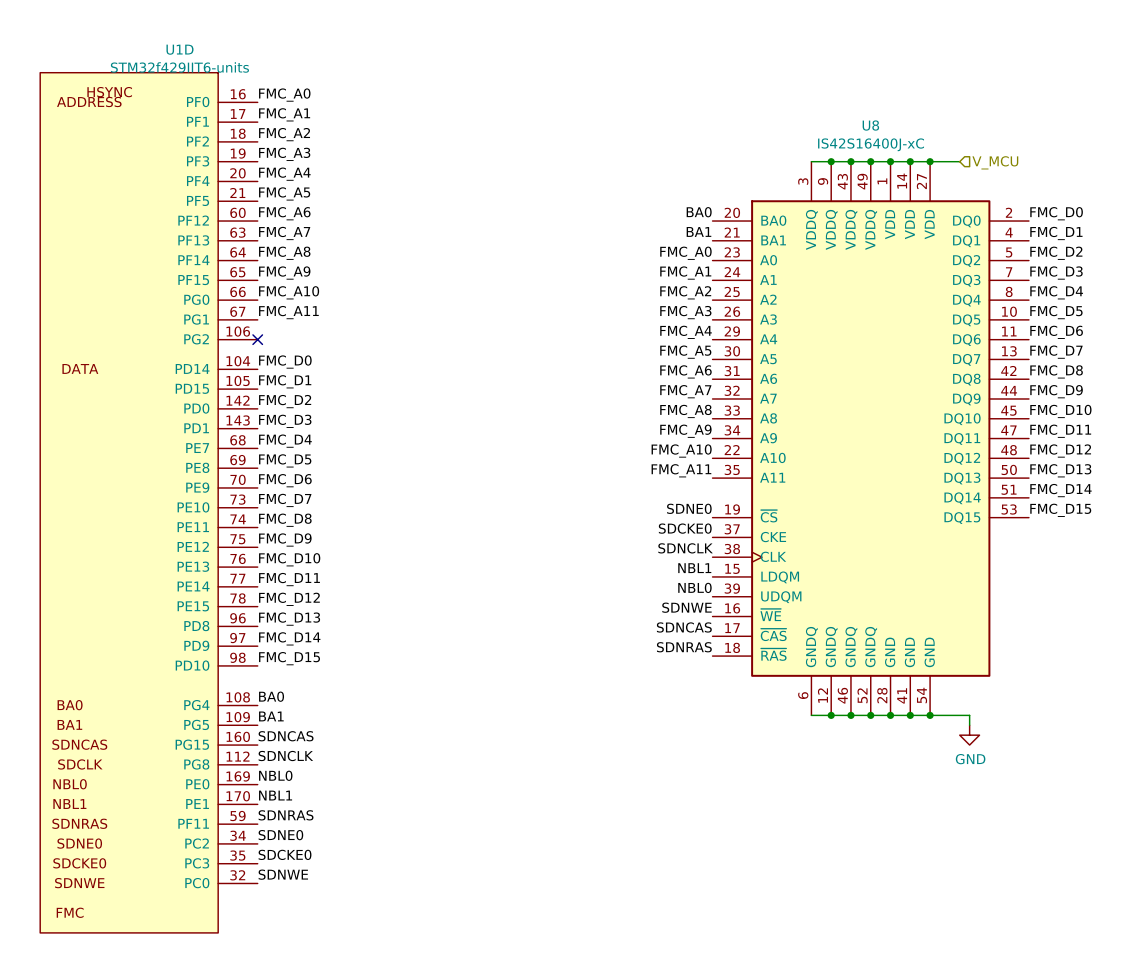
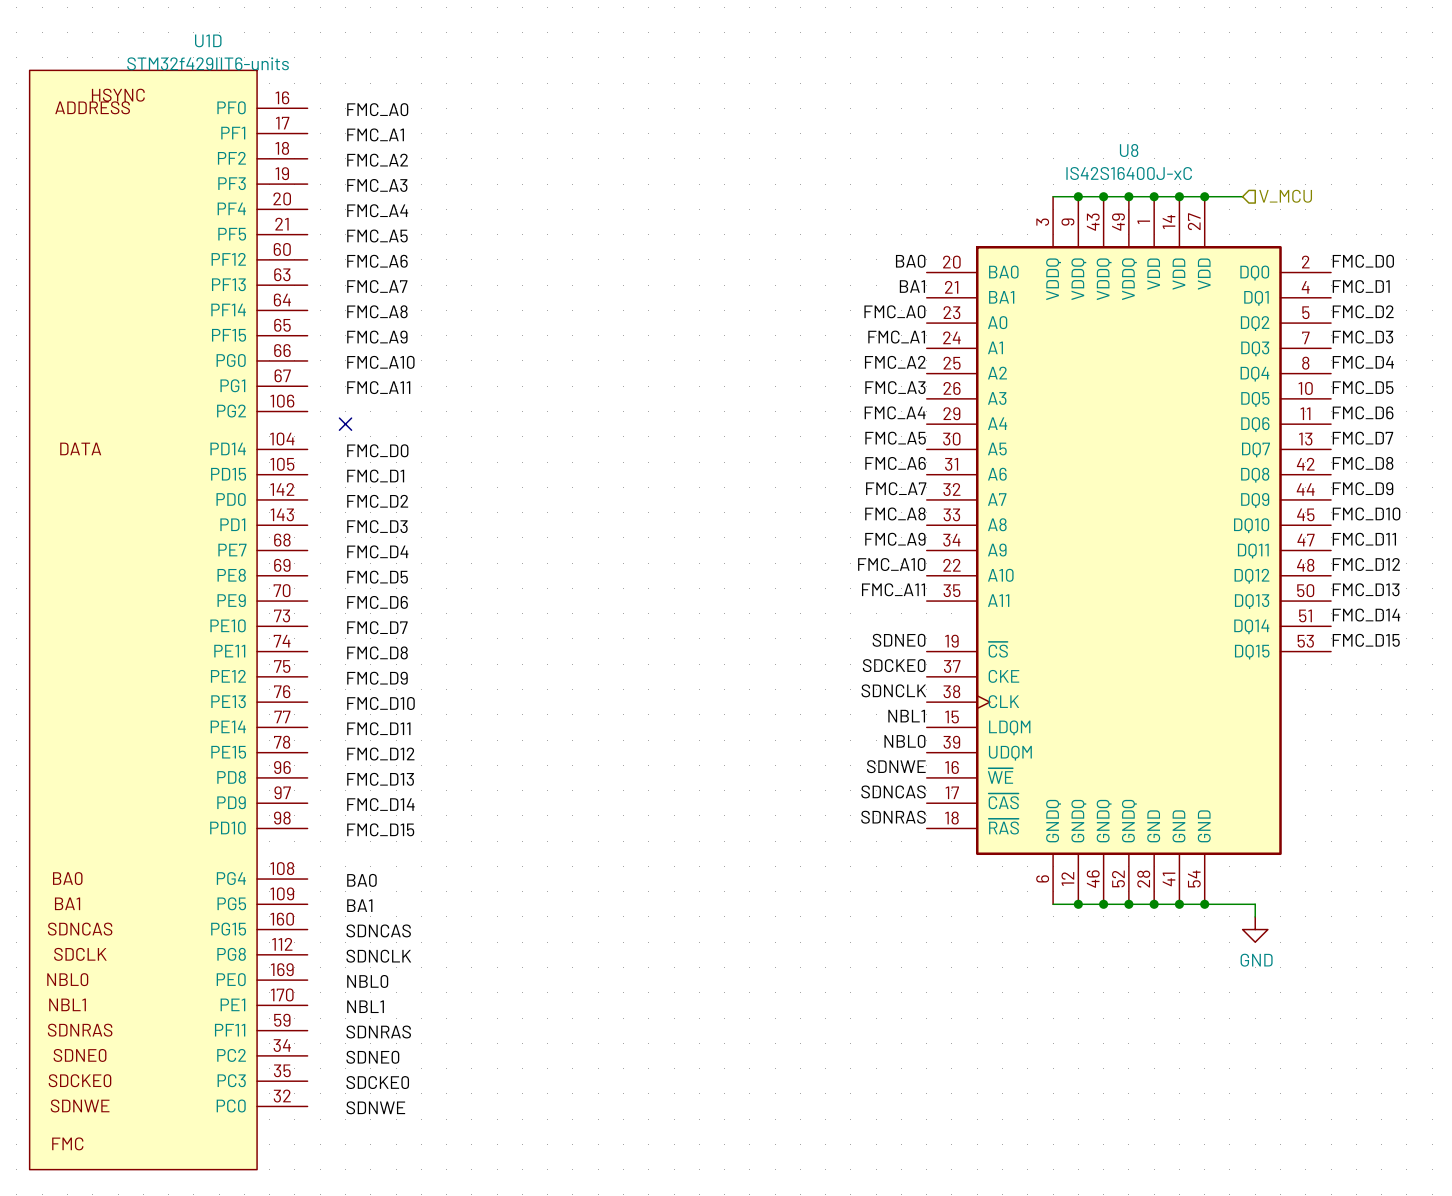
U1D position: (148, 502) -> (168, 620)

